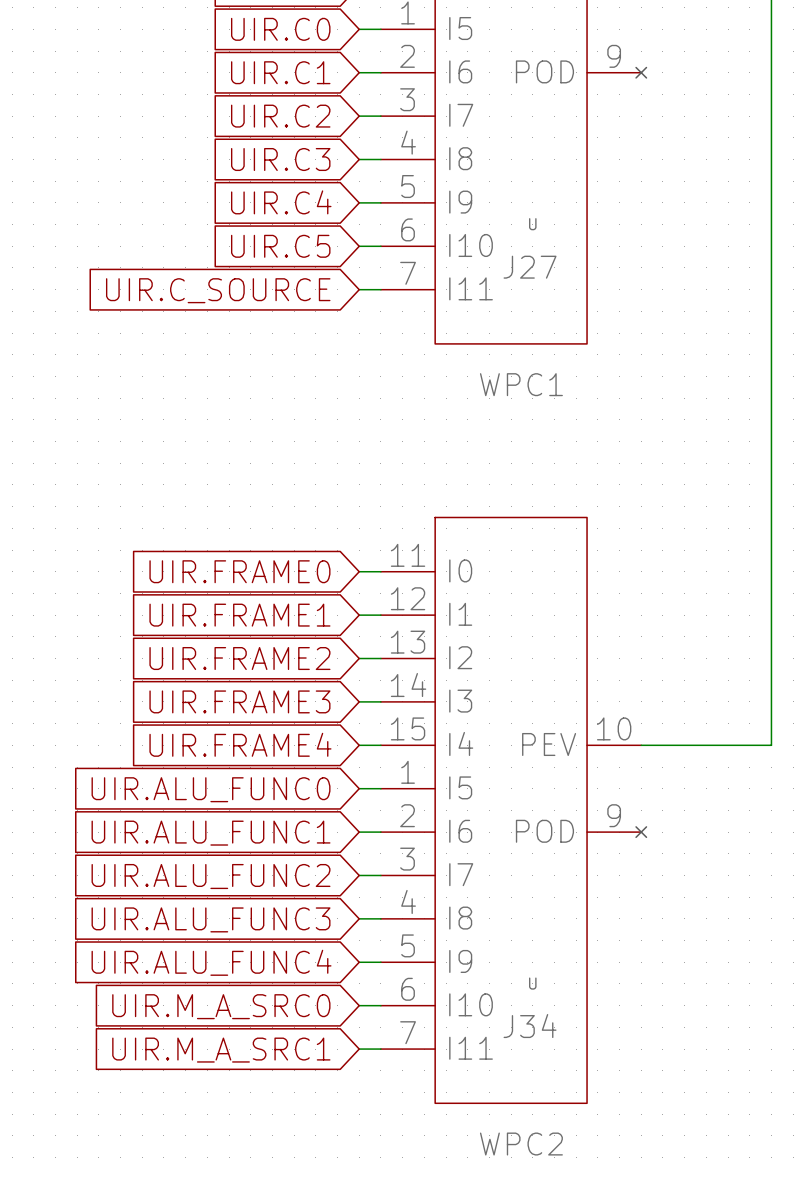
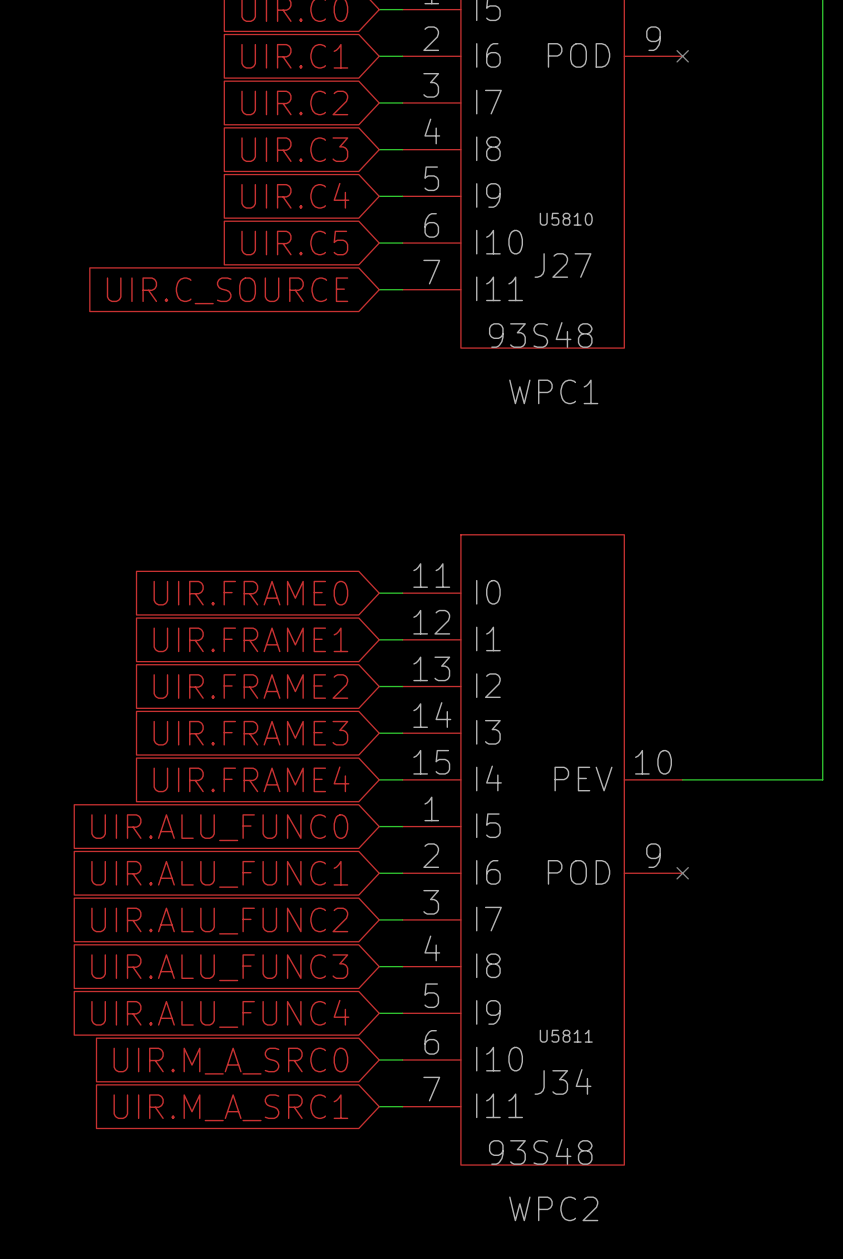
U name: U (532, 224) -> U5810 (566, 219)
U value: none -> 93S48 (540, 334)
U name: U (532, 983) -> U5811 (566, 1036)
U value: none -> 93S48 (540, 1151)

